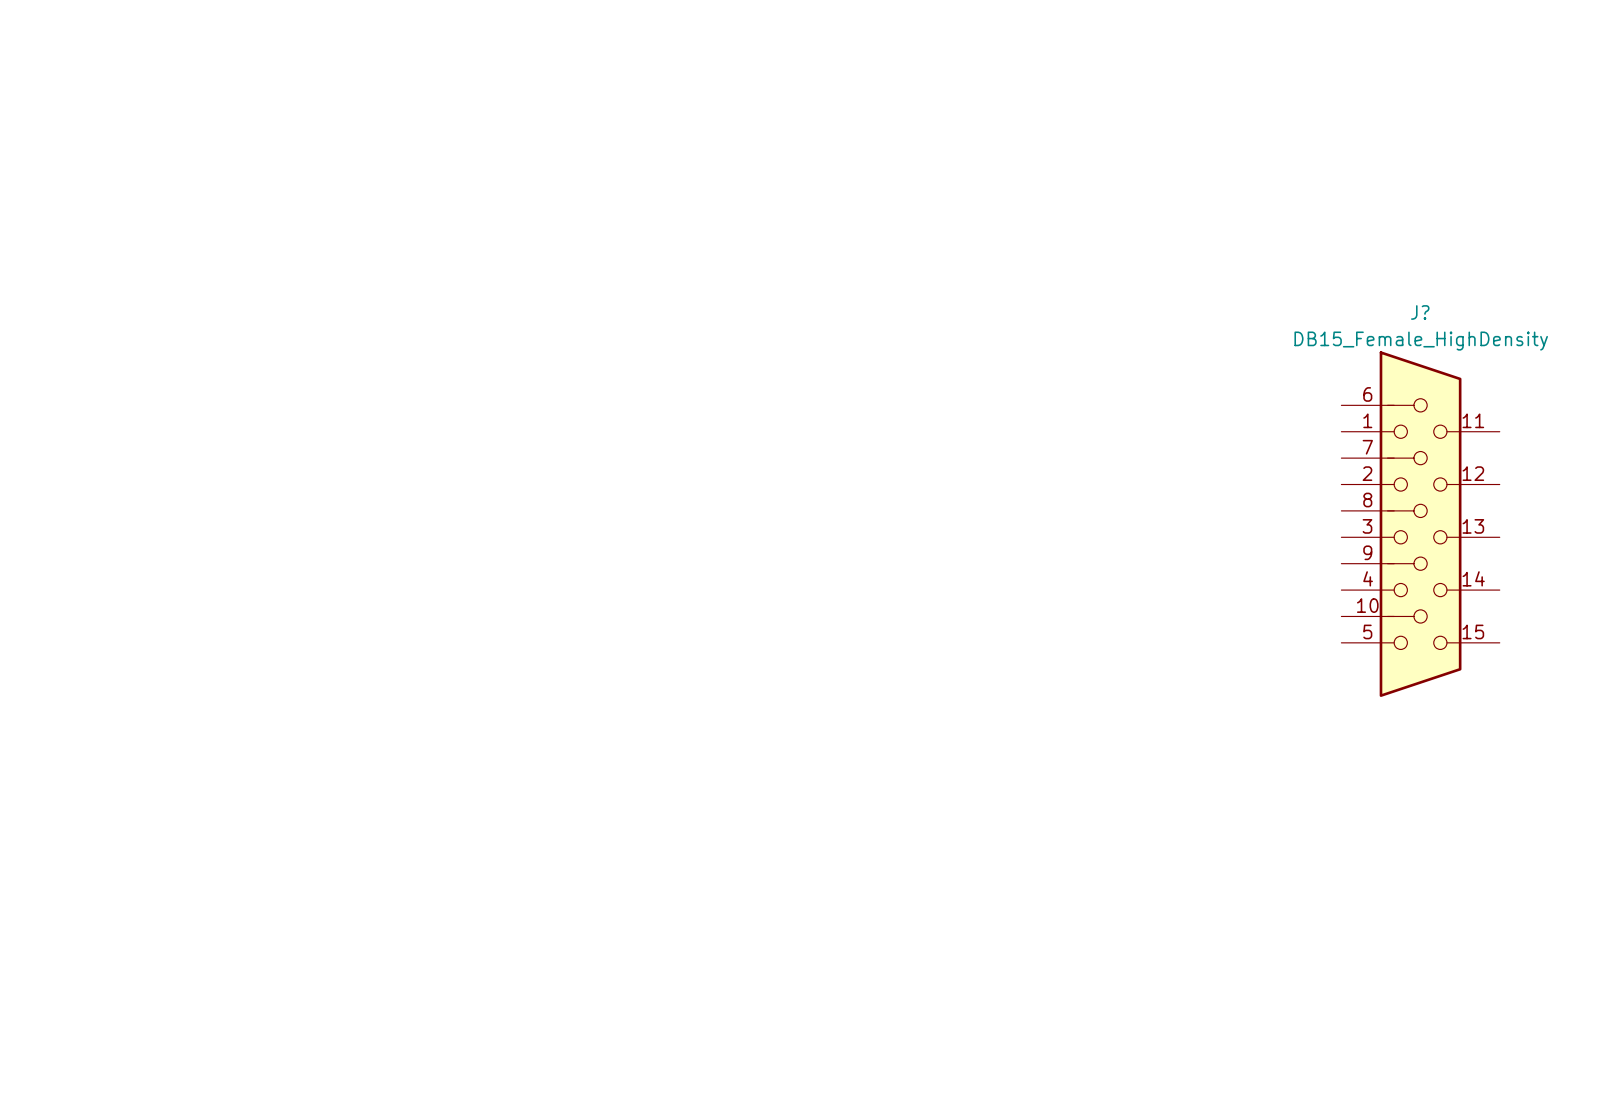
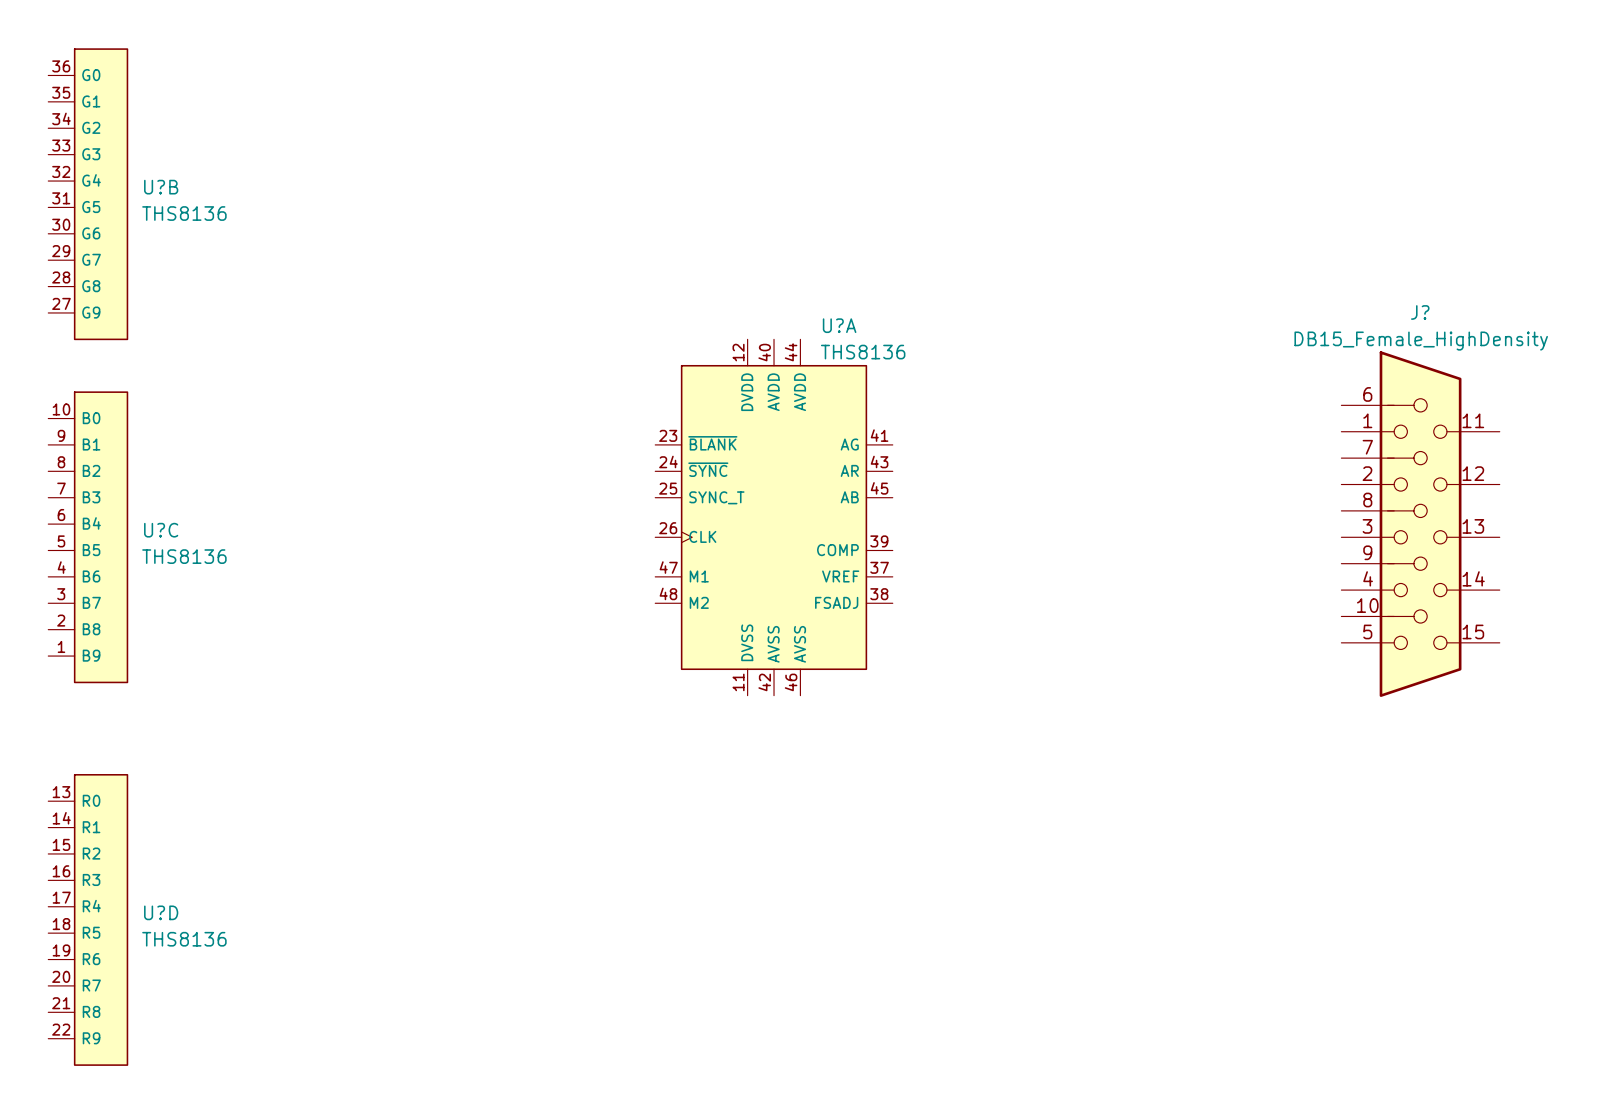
U?B: none -> THS8136 (88, 194)
U?A: none -> THS8136 (774, 517)
U?C: none -> THS8136 (88, 537)
U?D: none -> THS8136 (88, 919)

